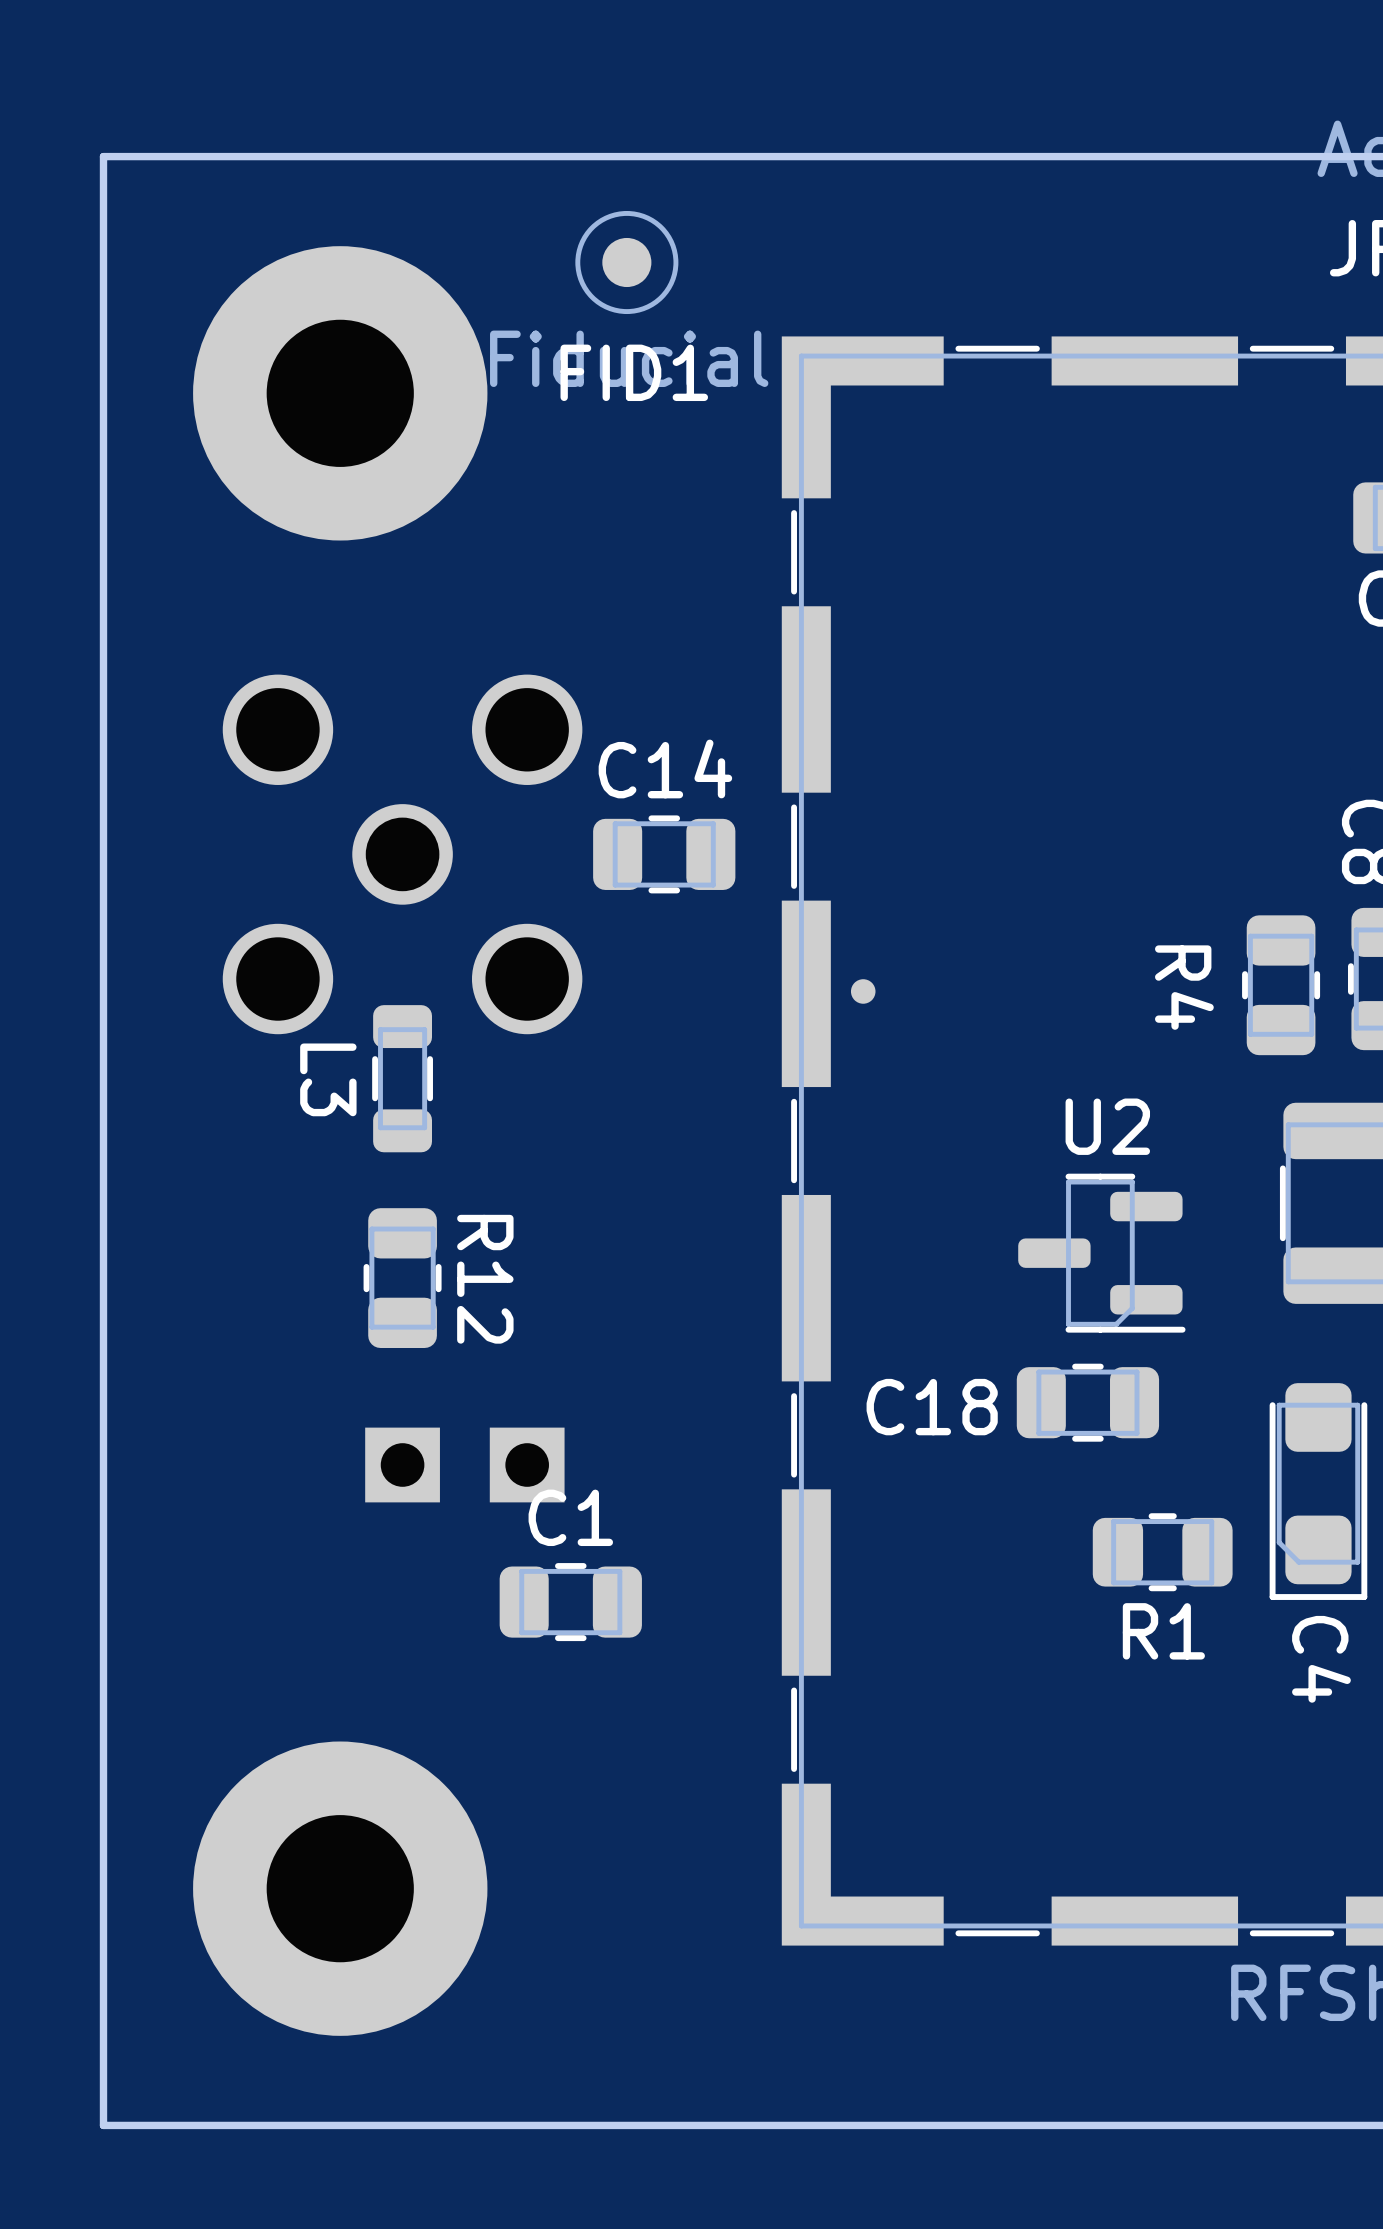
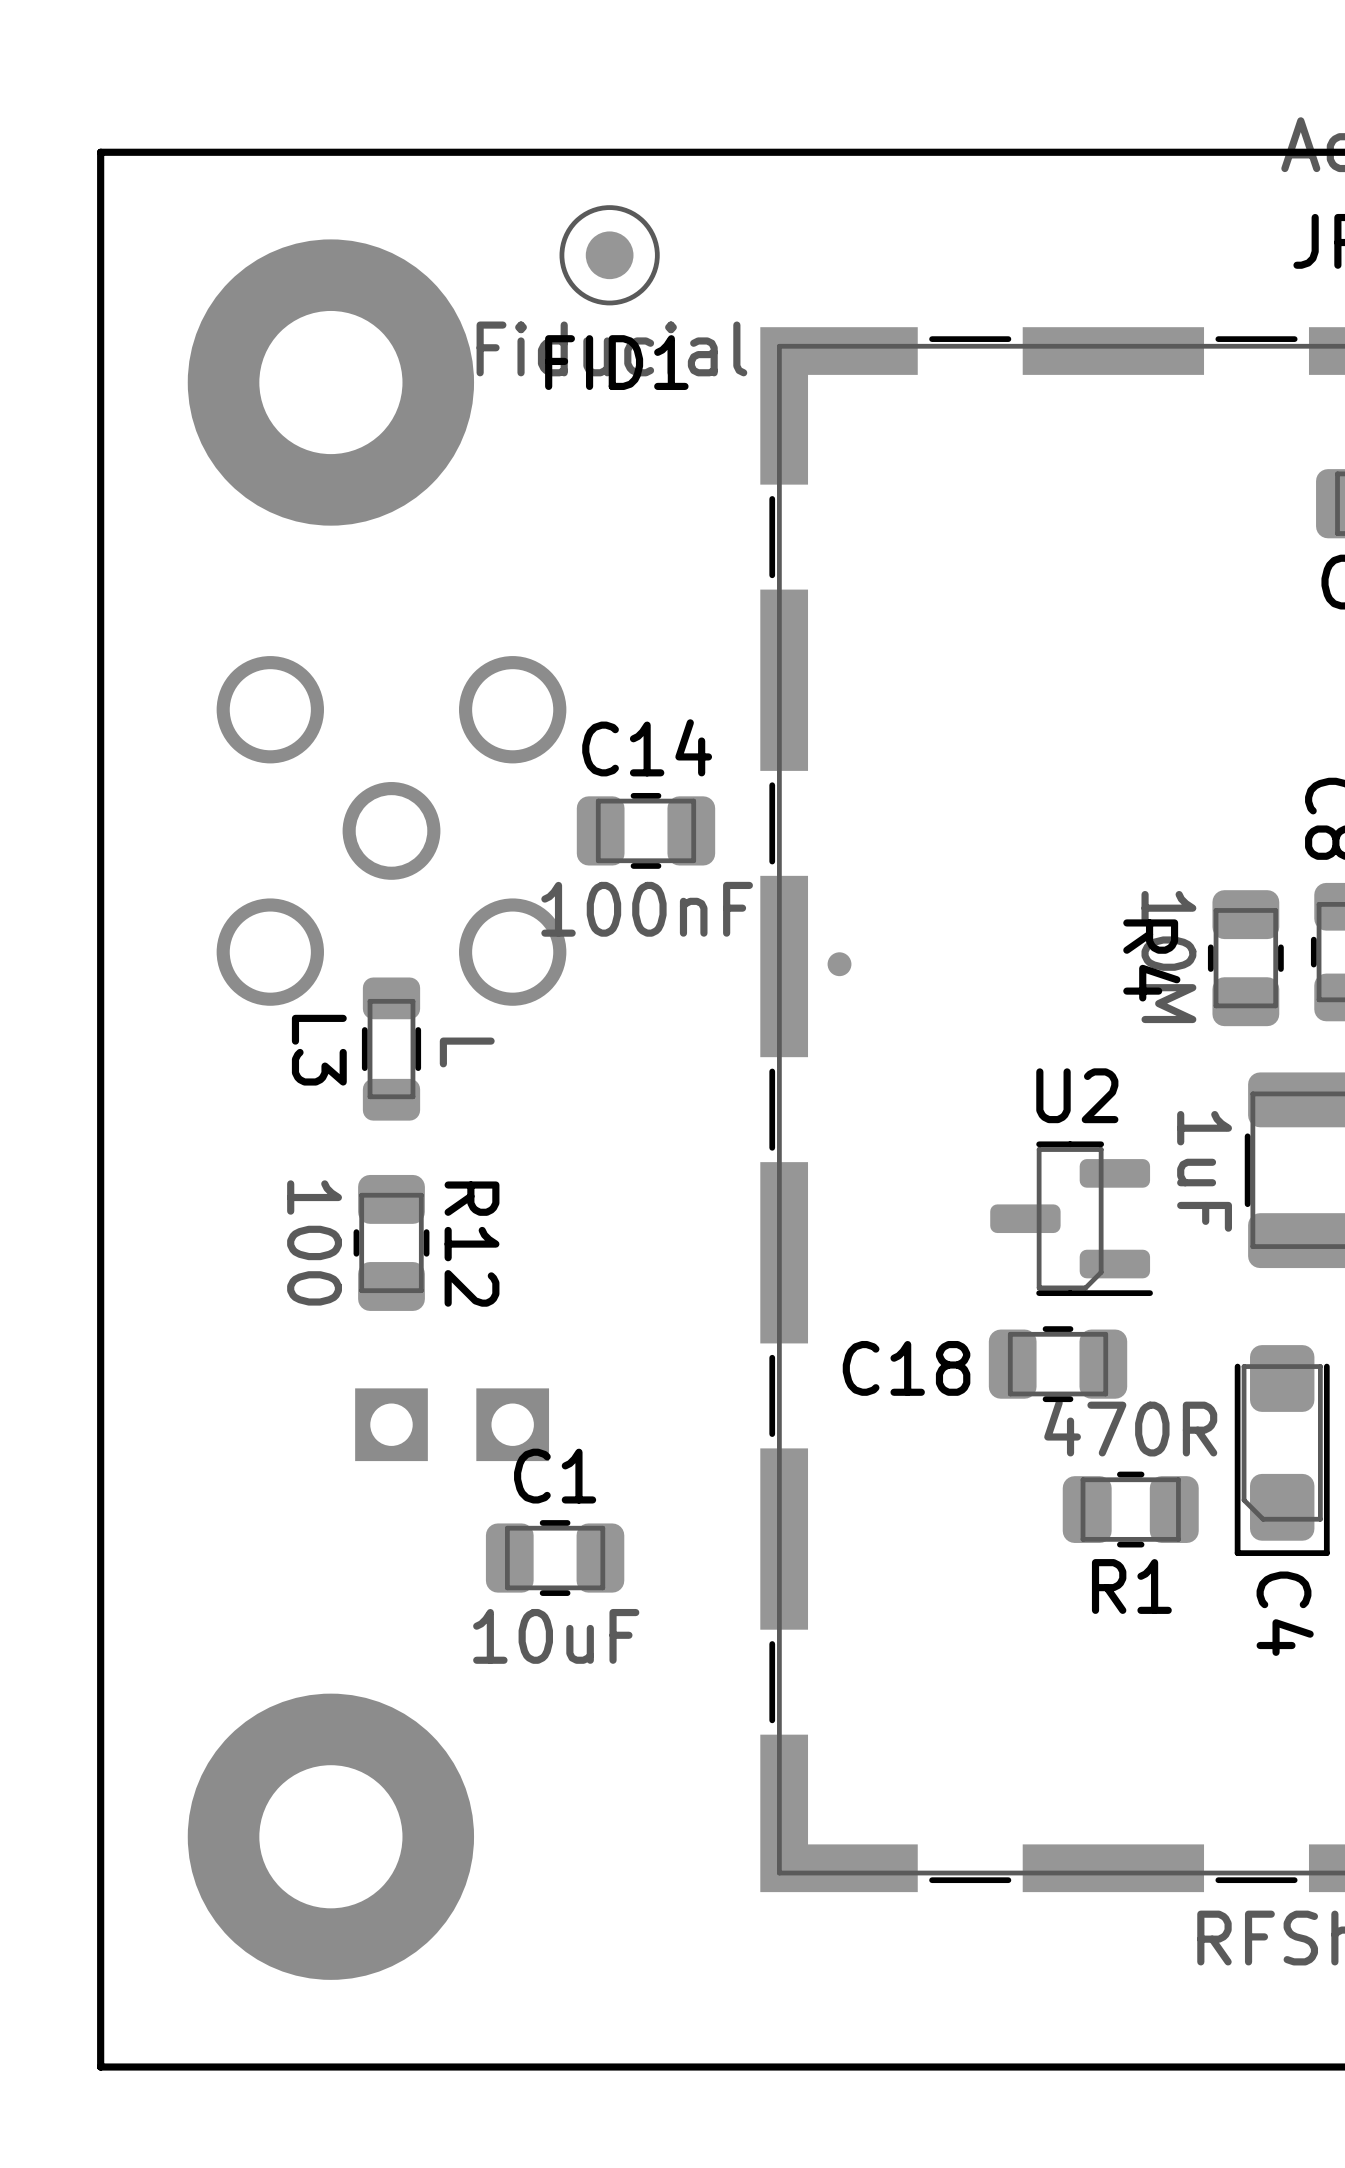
C14 value: none -> 100nF (647, 909)
R4 value: none -> 10M (1168, 957)
L3 value: none -> L (467, 1052)
part value: none -> 1uF (1204, 1171)
R12 value: none -> 100 (314, 1242)
R1 value: none -> 470R (1130, 1427)
C1 value: none -> 10uF (556, 1636)

